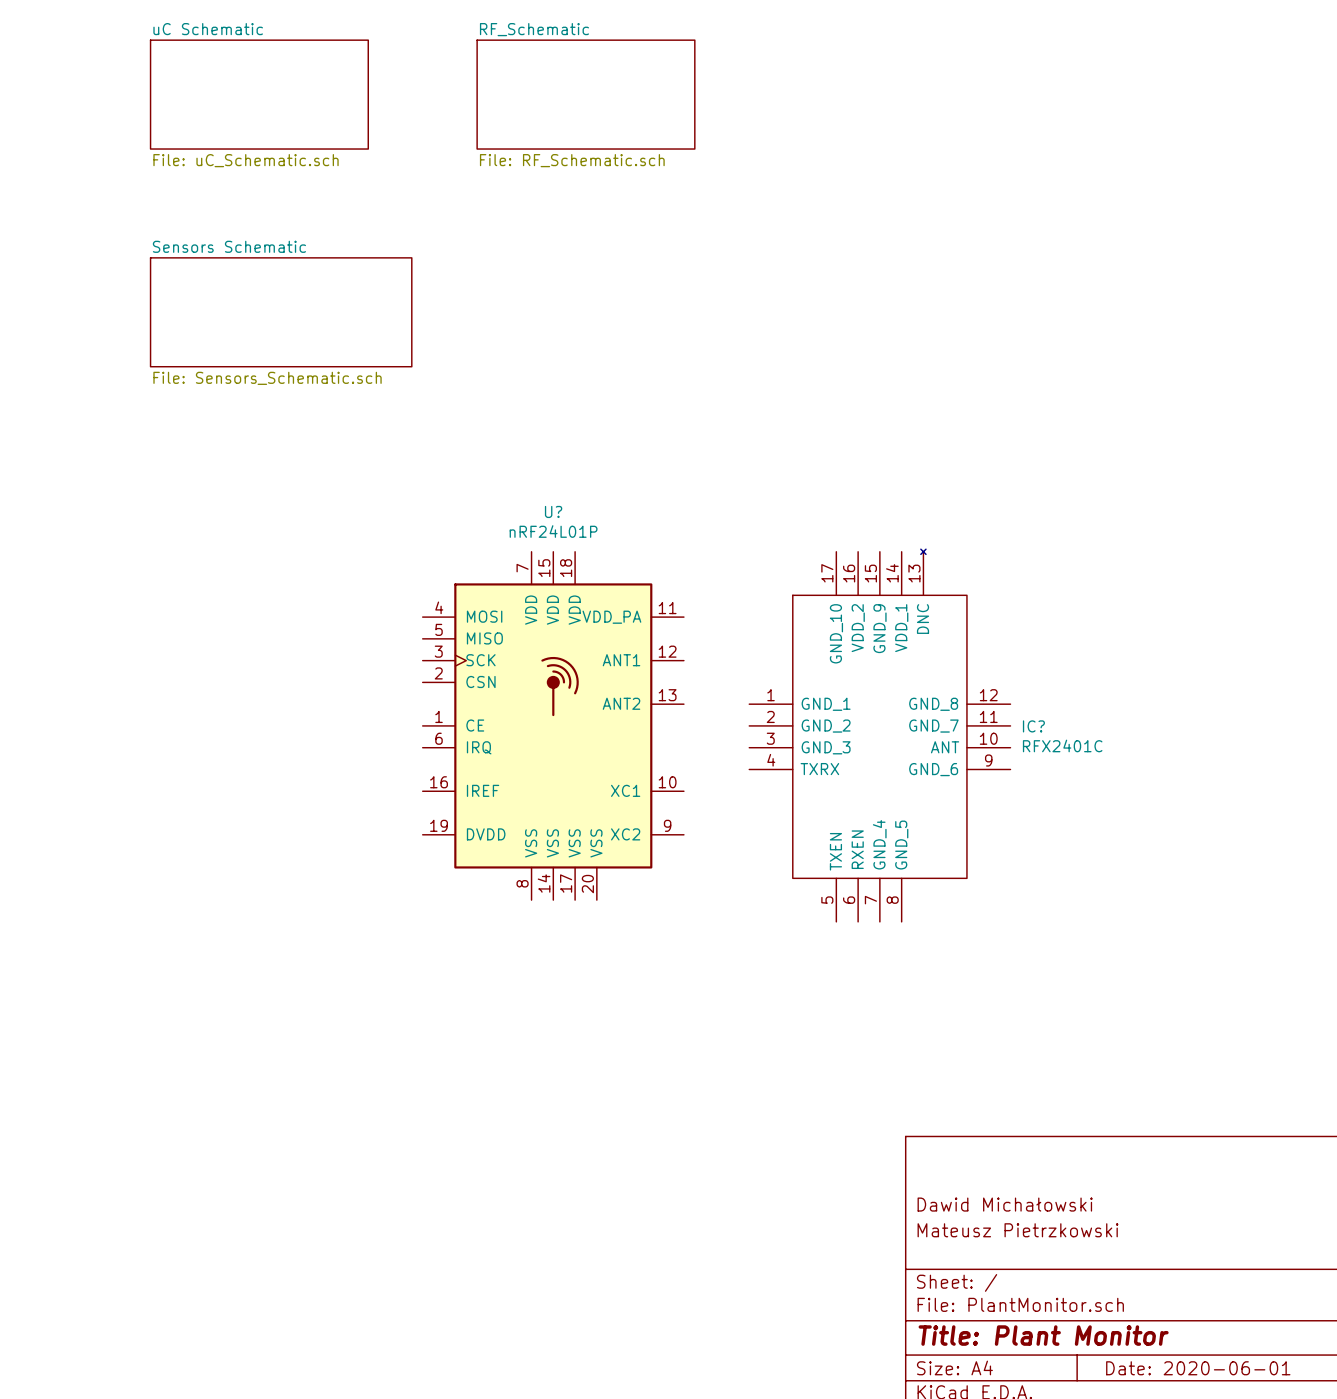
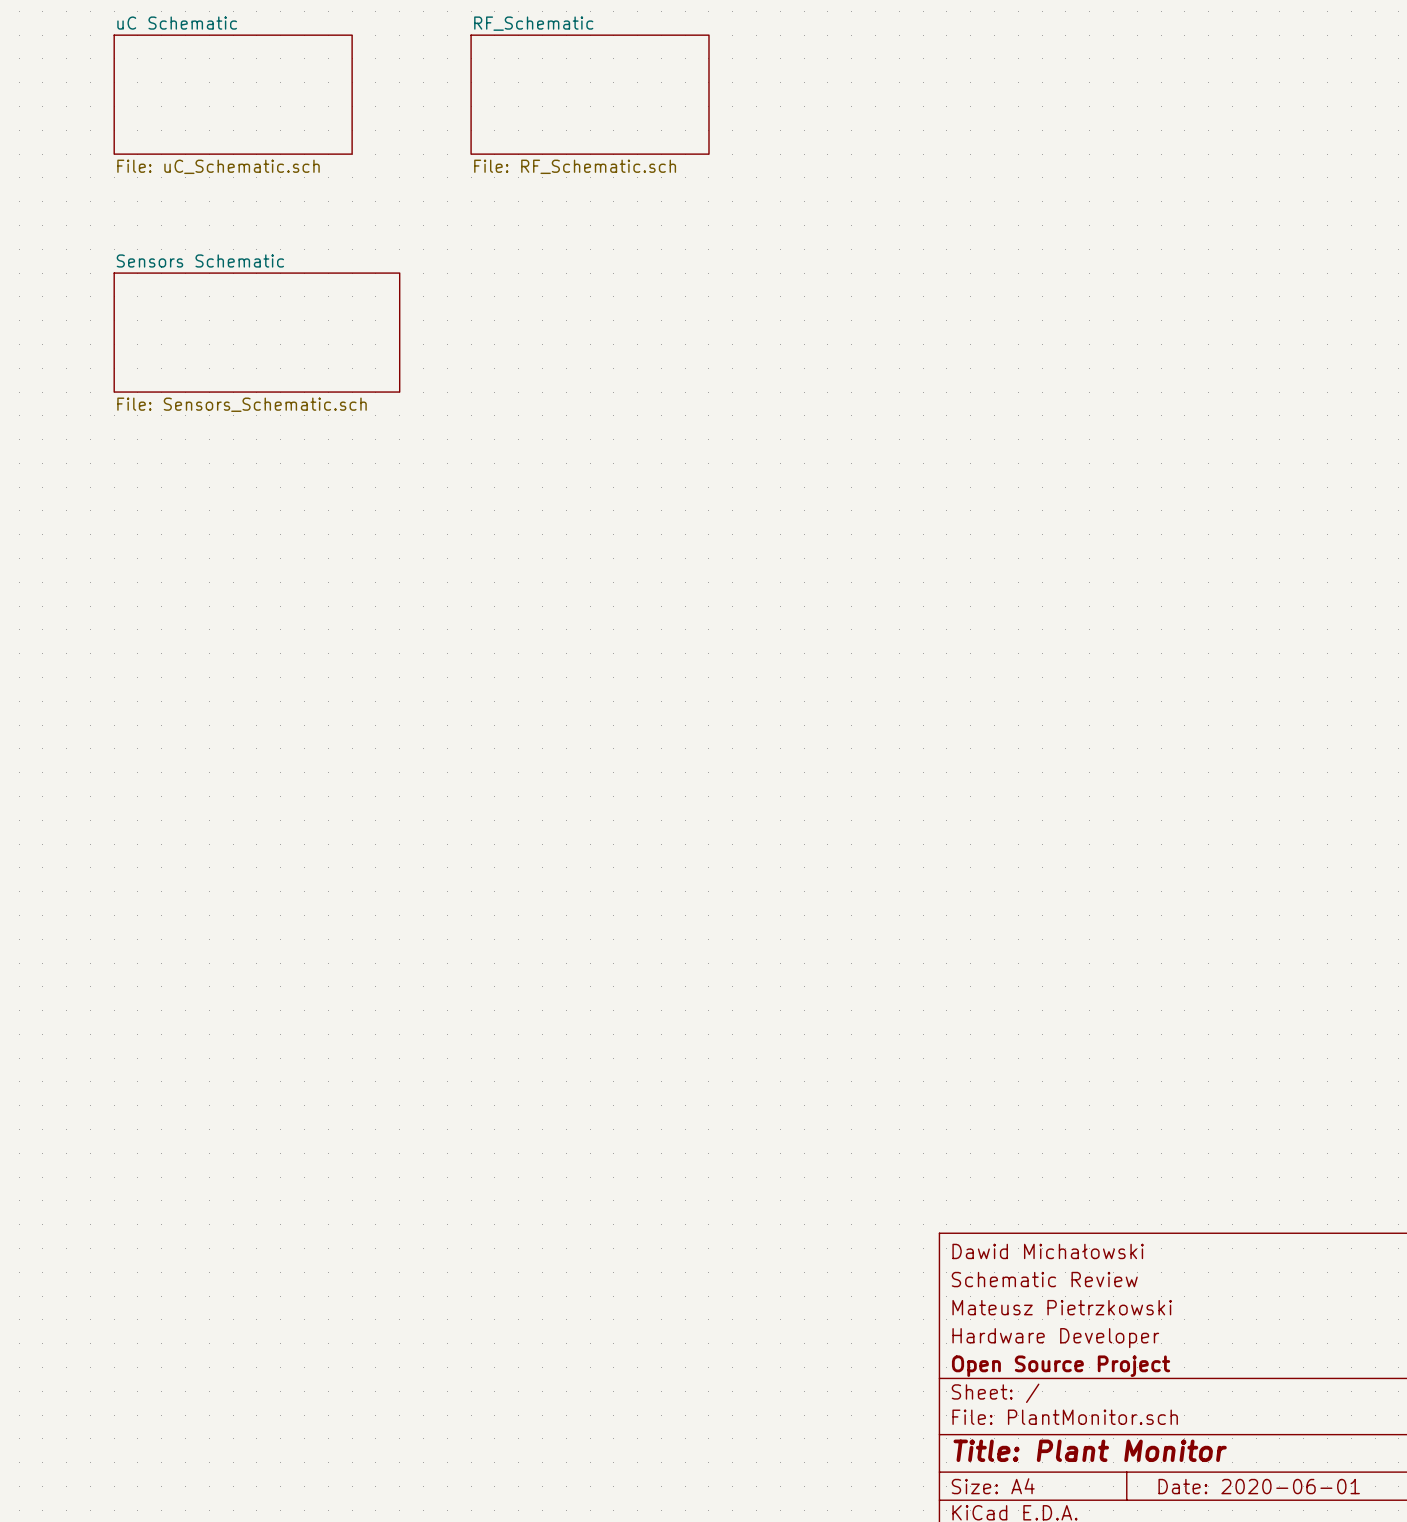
U?: nRF24L01P (553, 725) -> none
IC?: RFX2401C (879, 735) -> none
title block: none -> Dawid Michałowski (1048, 1251)
title block: none -> Schematic Review (1044, 1279)
title block: Dawid Michałowski (1005, 1204) -> Mateusz Pietrzkowski (1062, 1307)
title block: Mateusz Pietrzkowski (1017, 1230) -> Hardware Developer (1055, 1338)
title block: none -> Open Source Project (1061, 1366)

